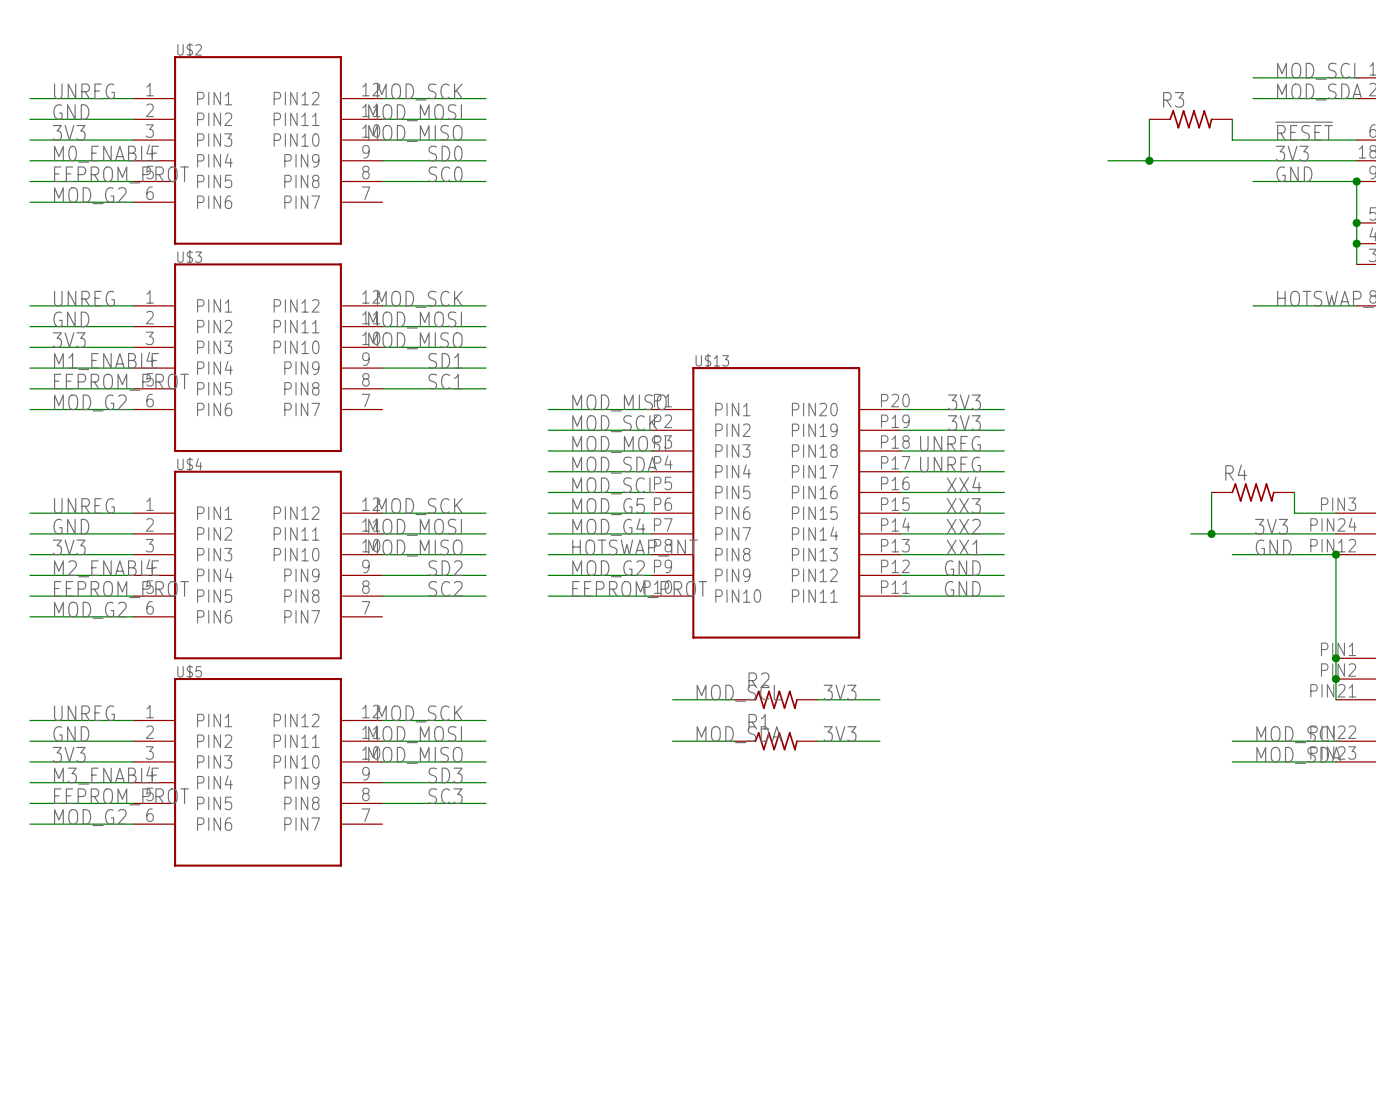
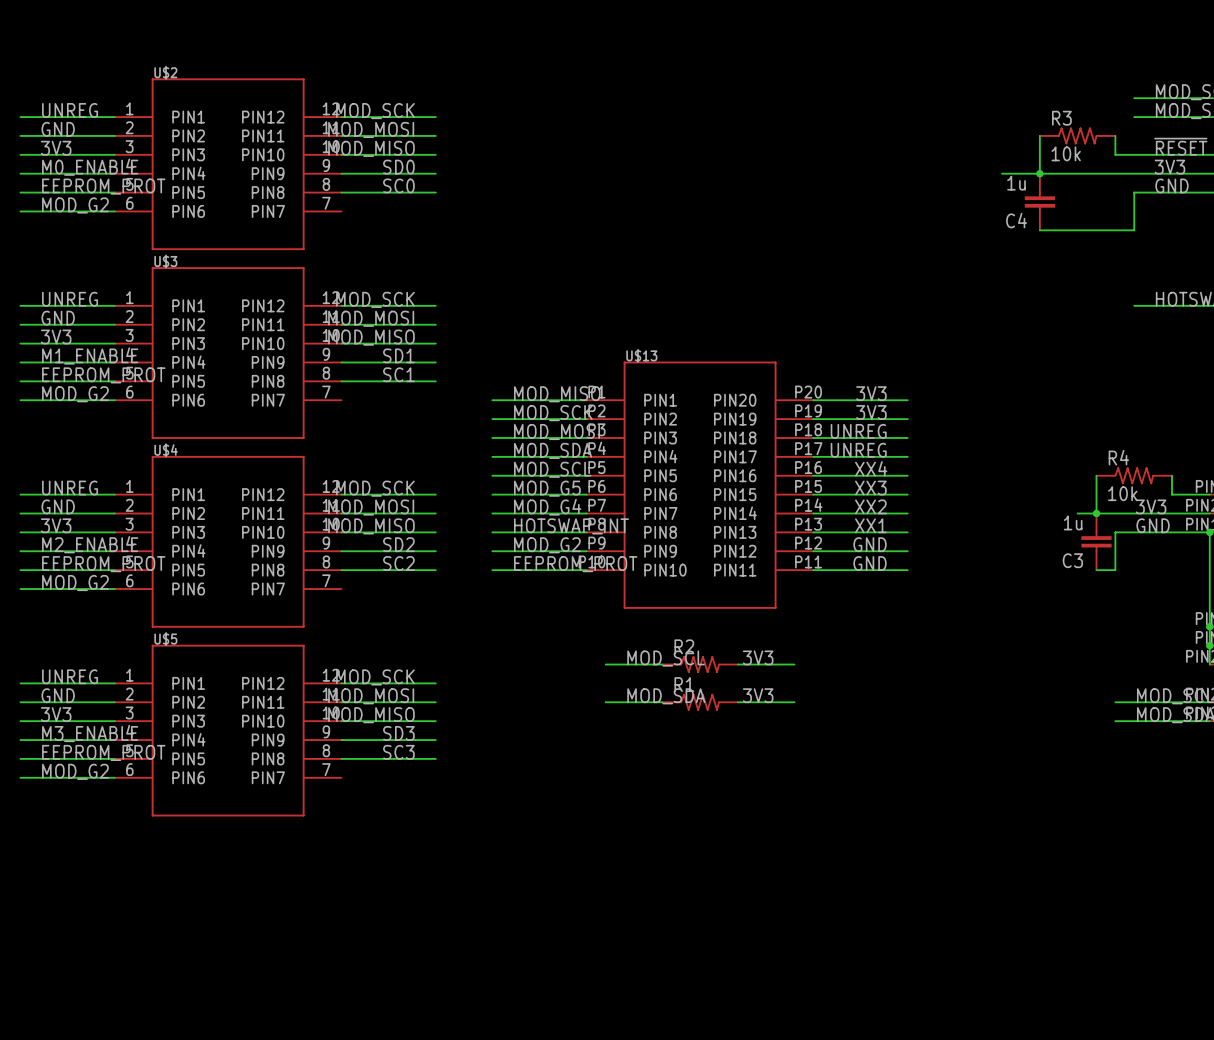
R3 value: none -> 10k (1066, 153)
wire: none -> (1134, 192) (1134, 230) (1039, 230)
C4: none -> 1u (1039, 202)
R4 value: none -> 10k (1122, 493)
wire: none -> (1115, 532) (1115, 570) (1096, 570)
C3: none -> 1u (1096, 541)

